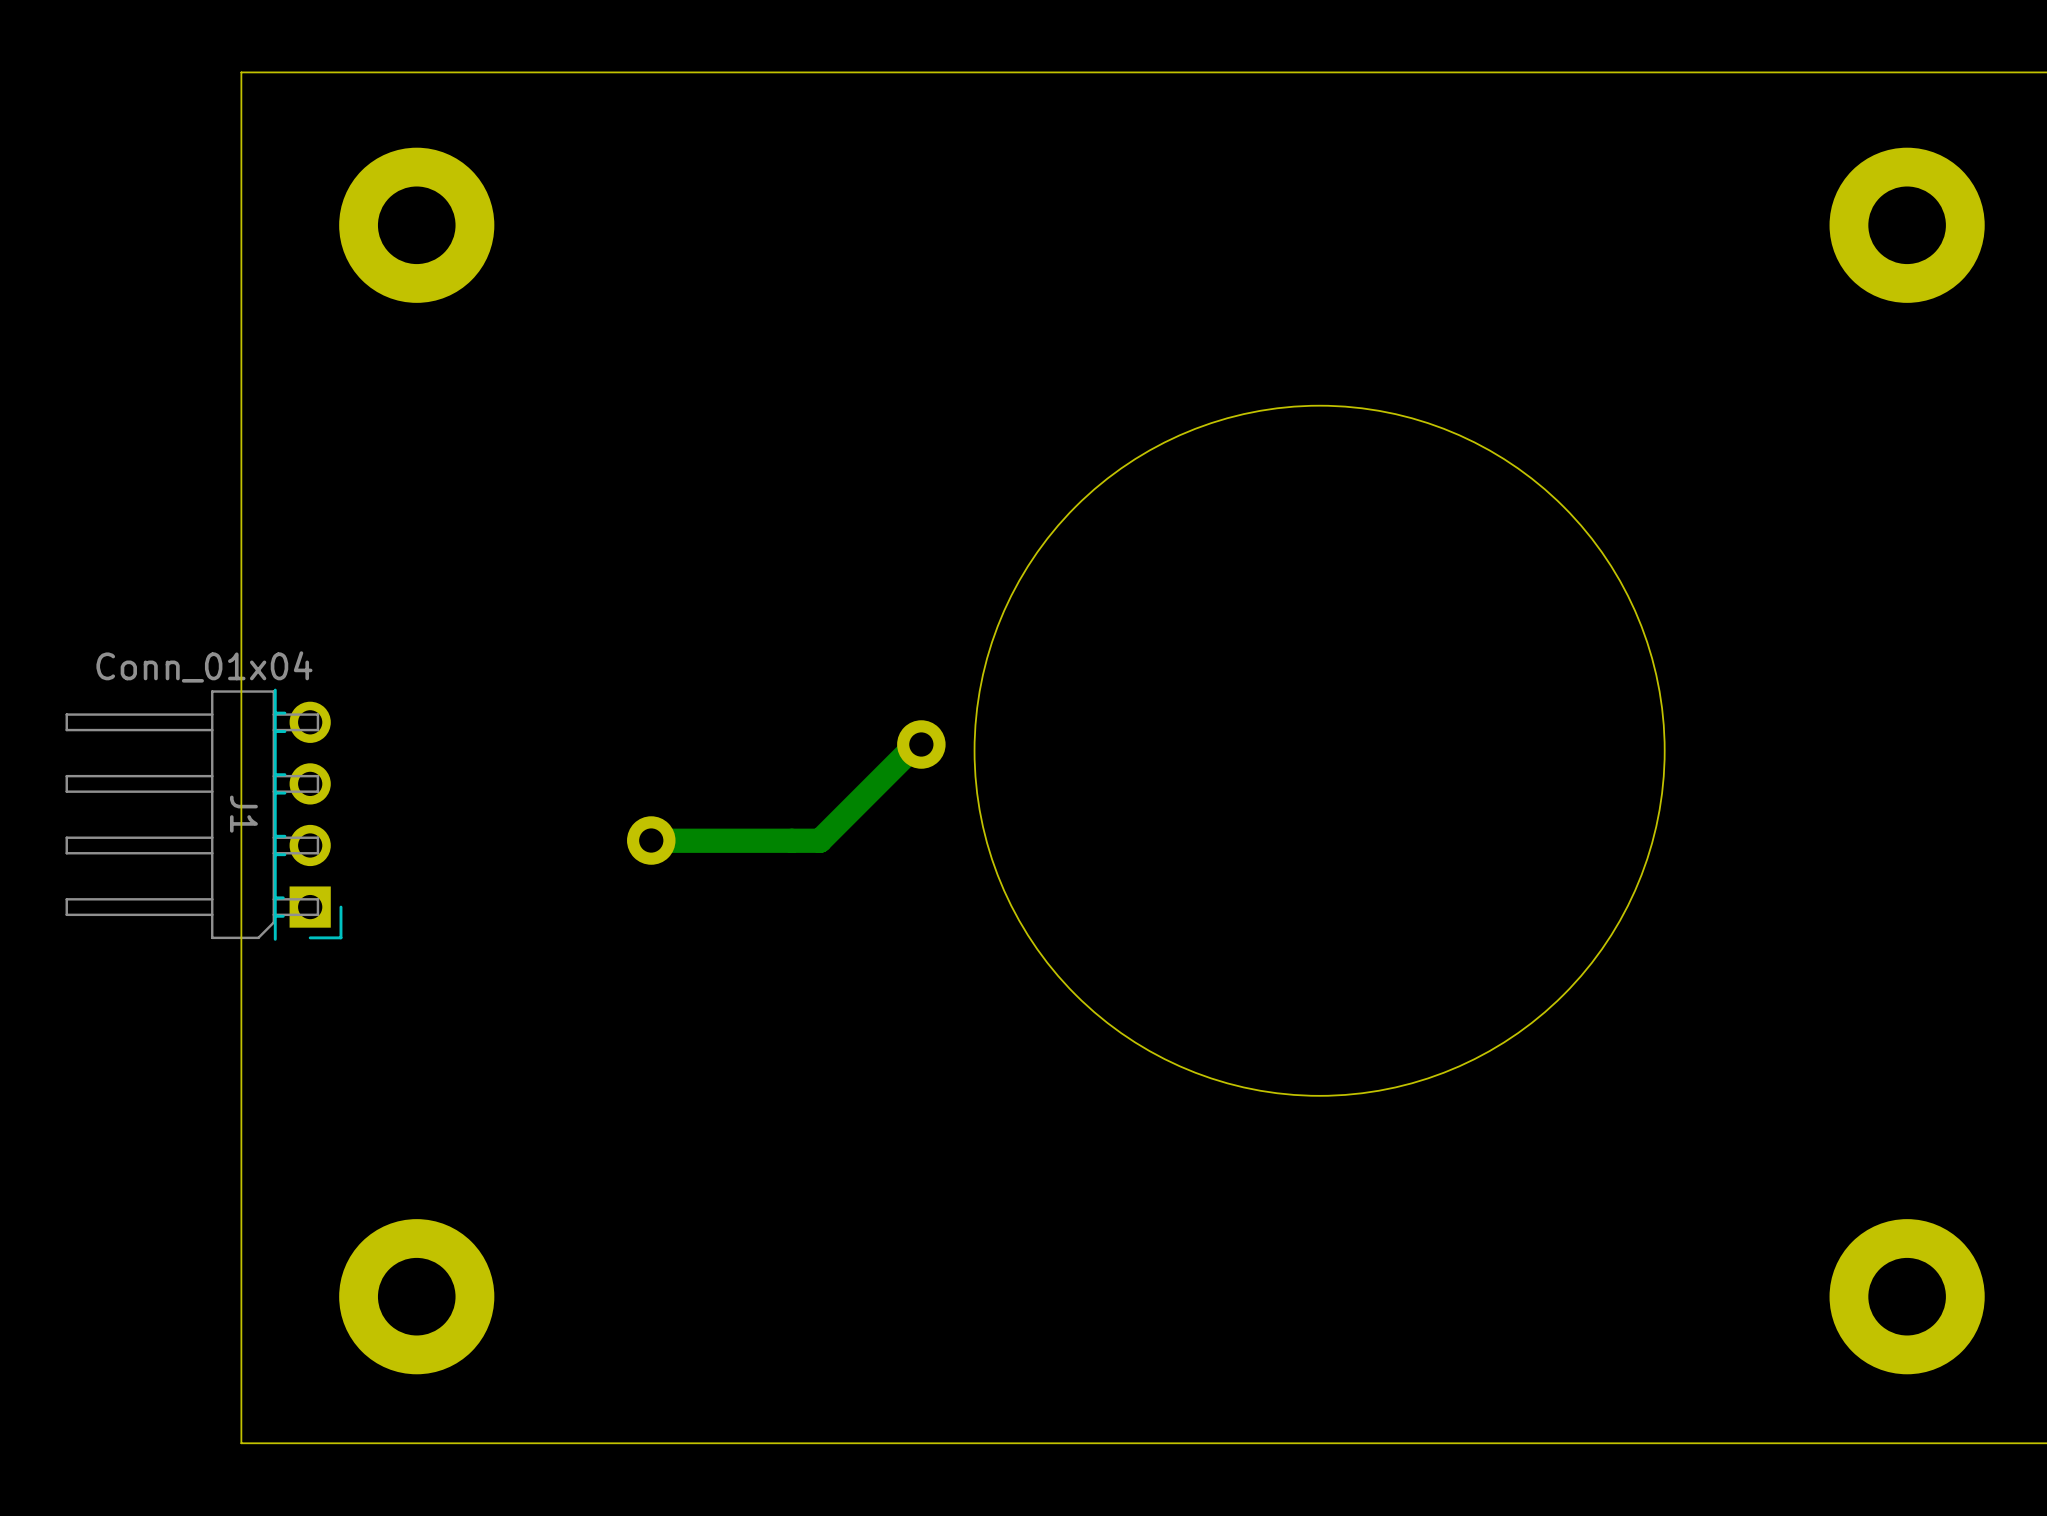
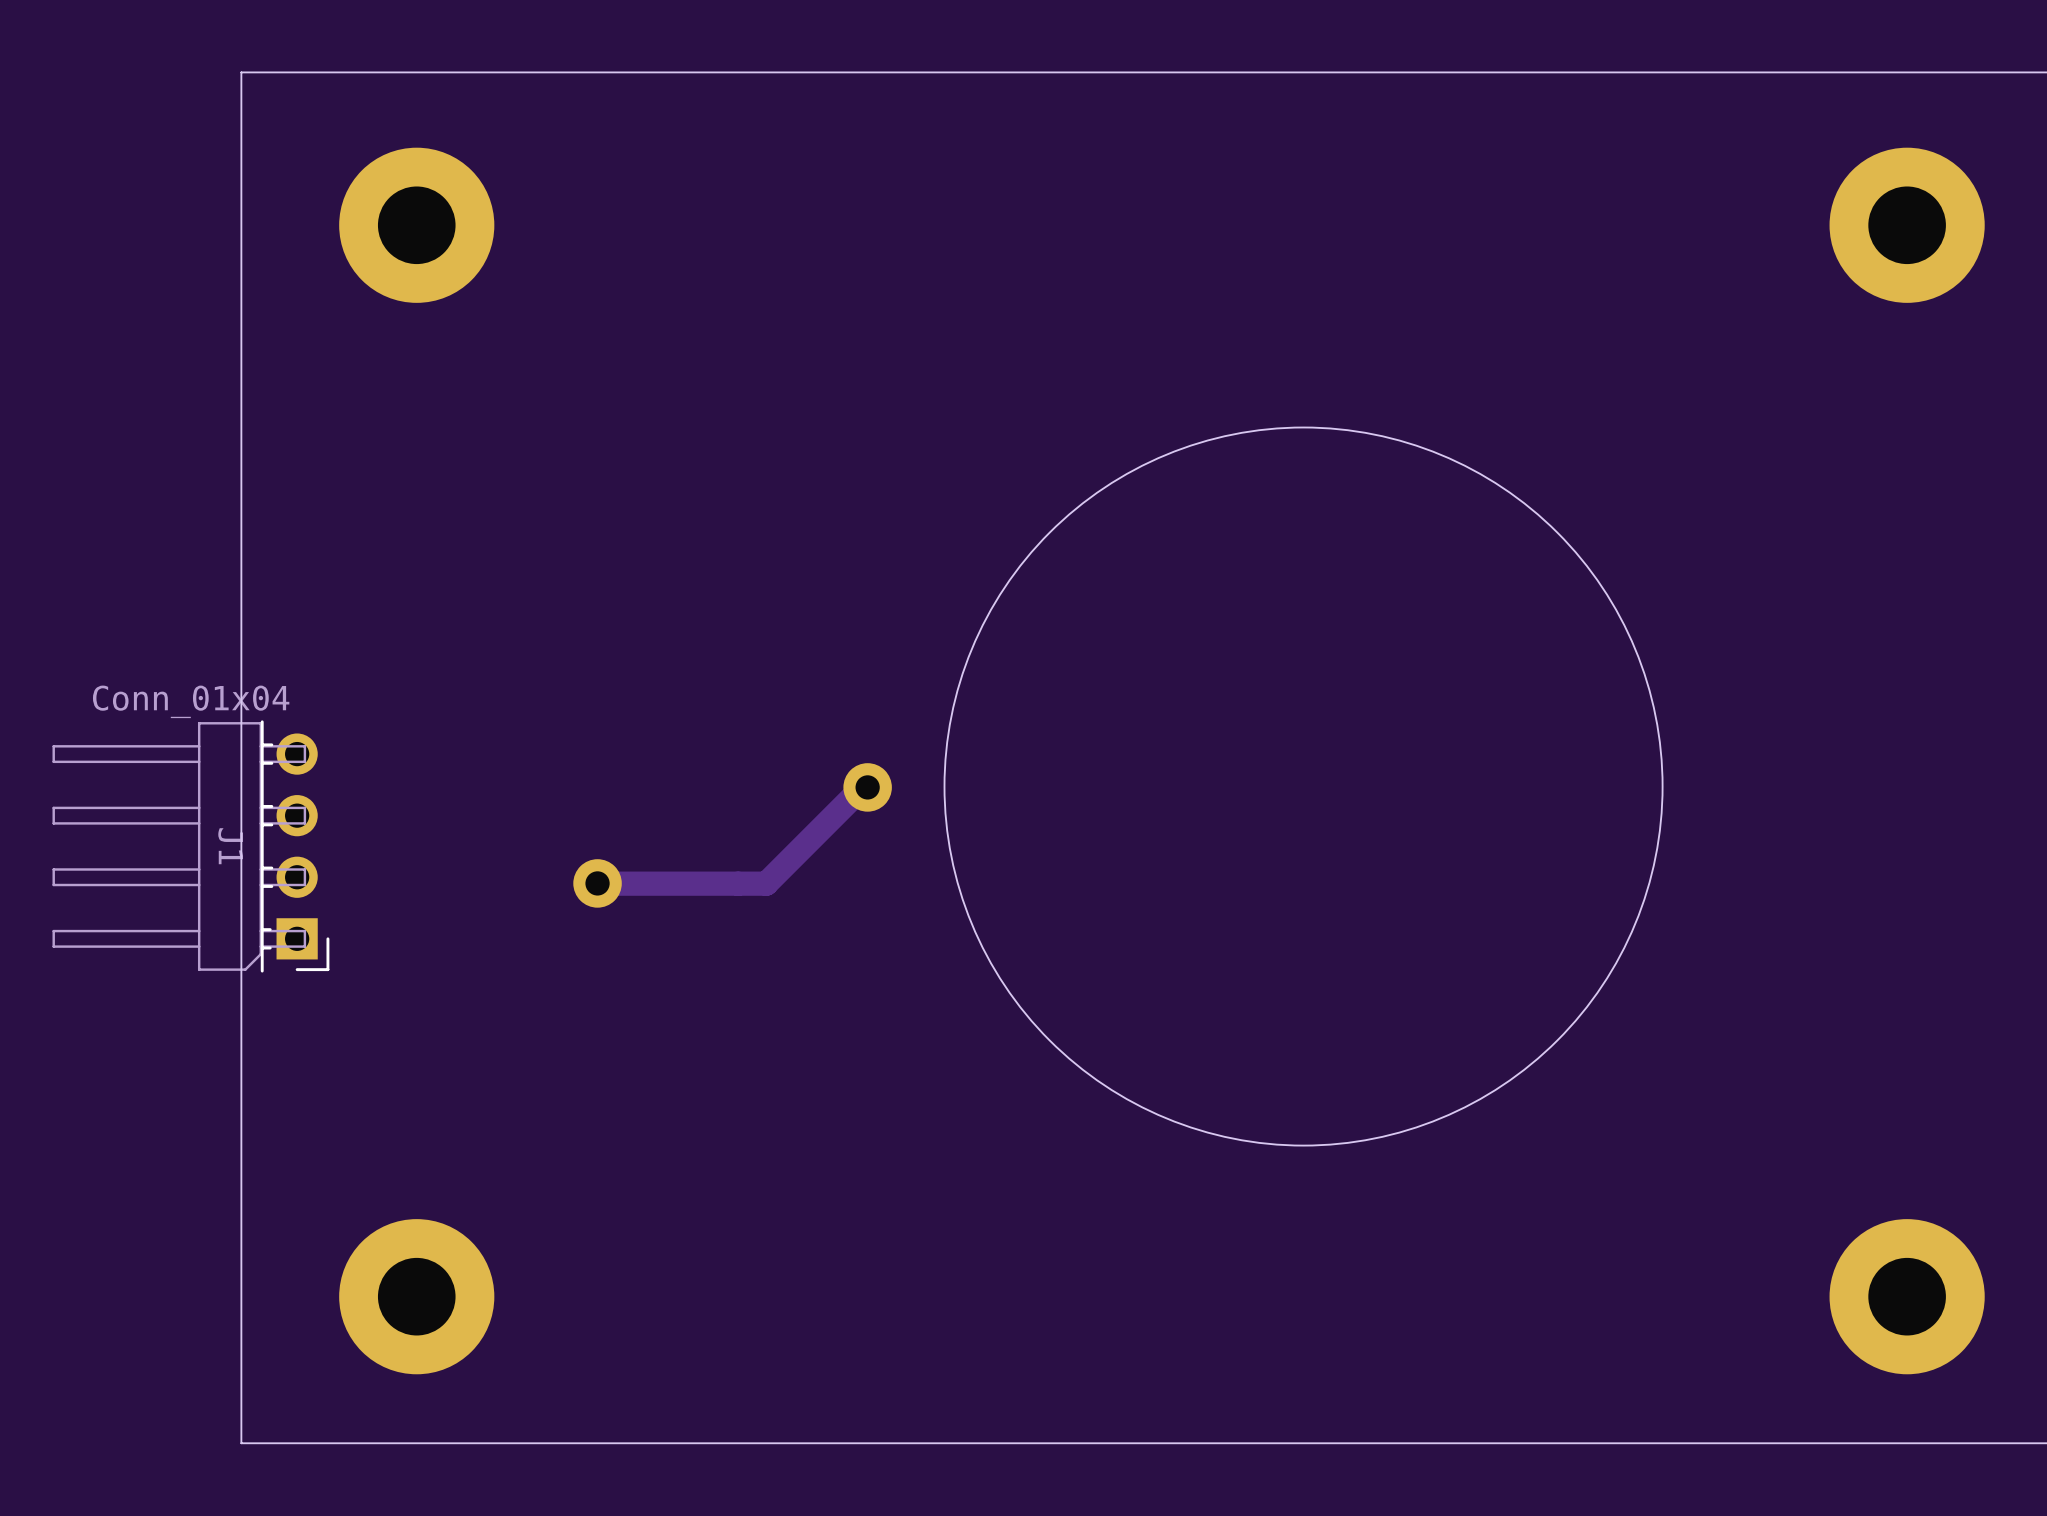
round board edge: [973, 405, 1666, 1097] -> none
round board edge: none -> [943, 426, 1664, 1147]
part position: (786, 792) -> (732, 835)
J1 position: (203, 814) -> (190, 846)

